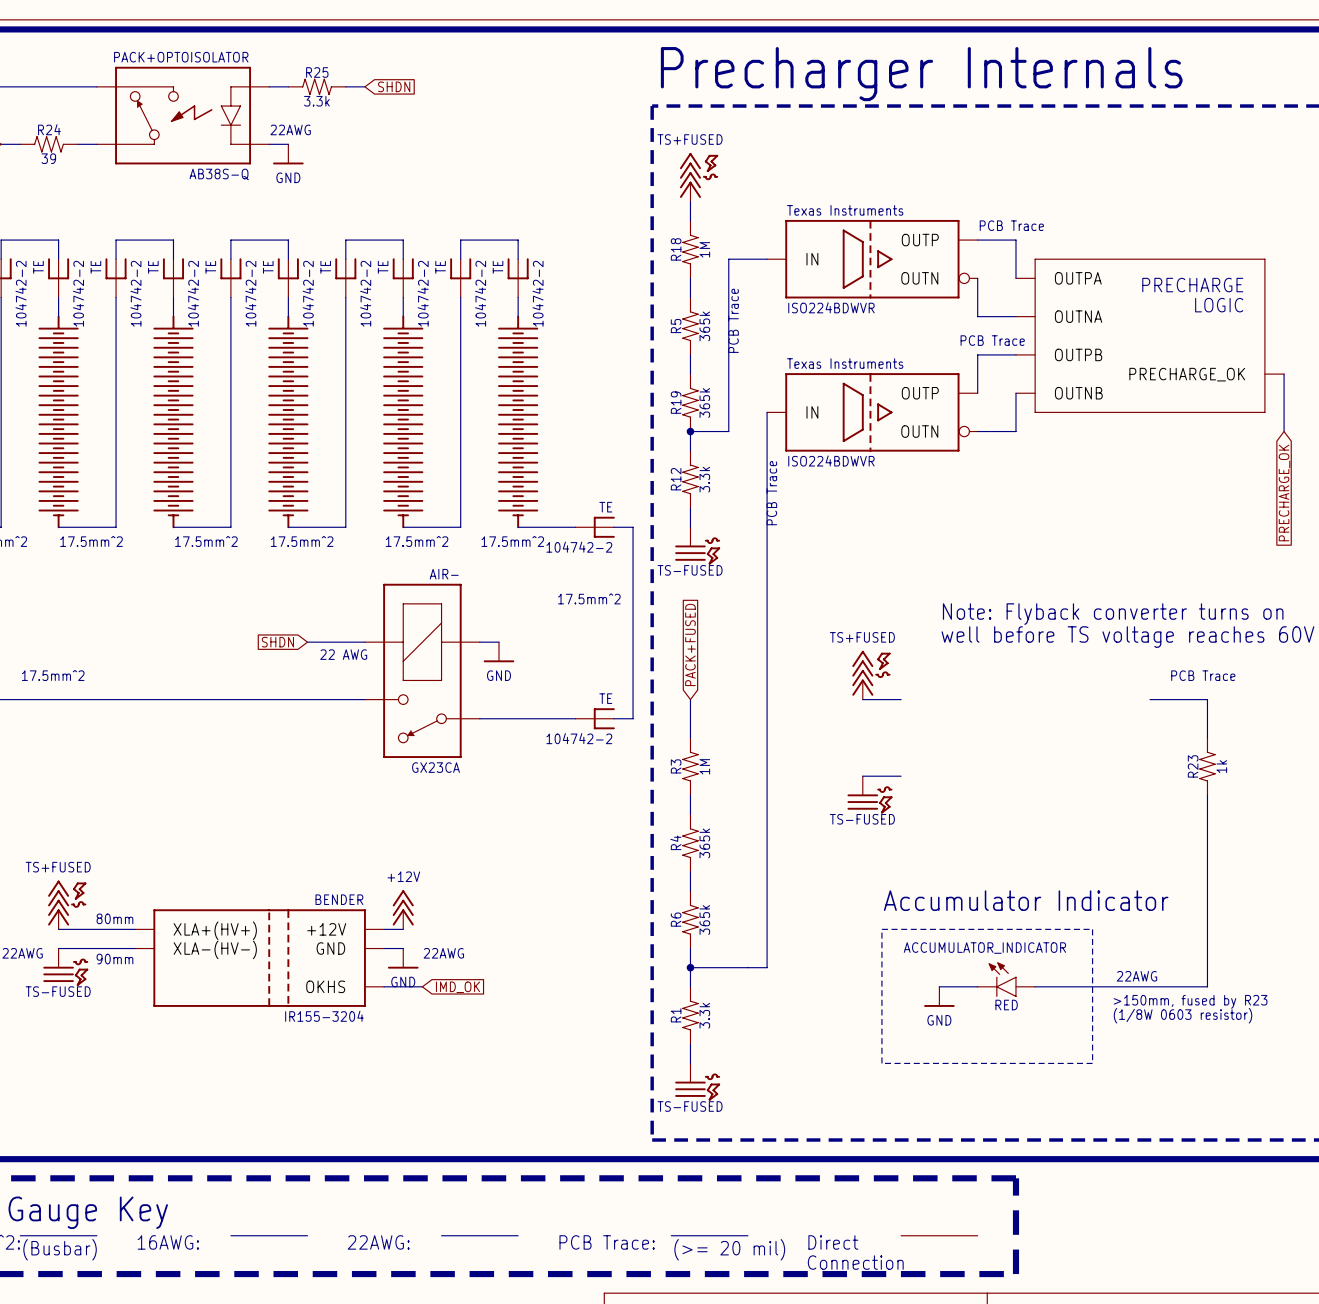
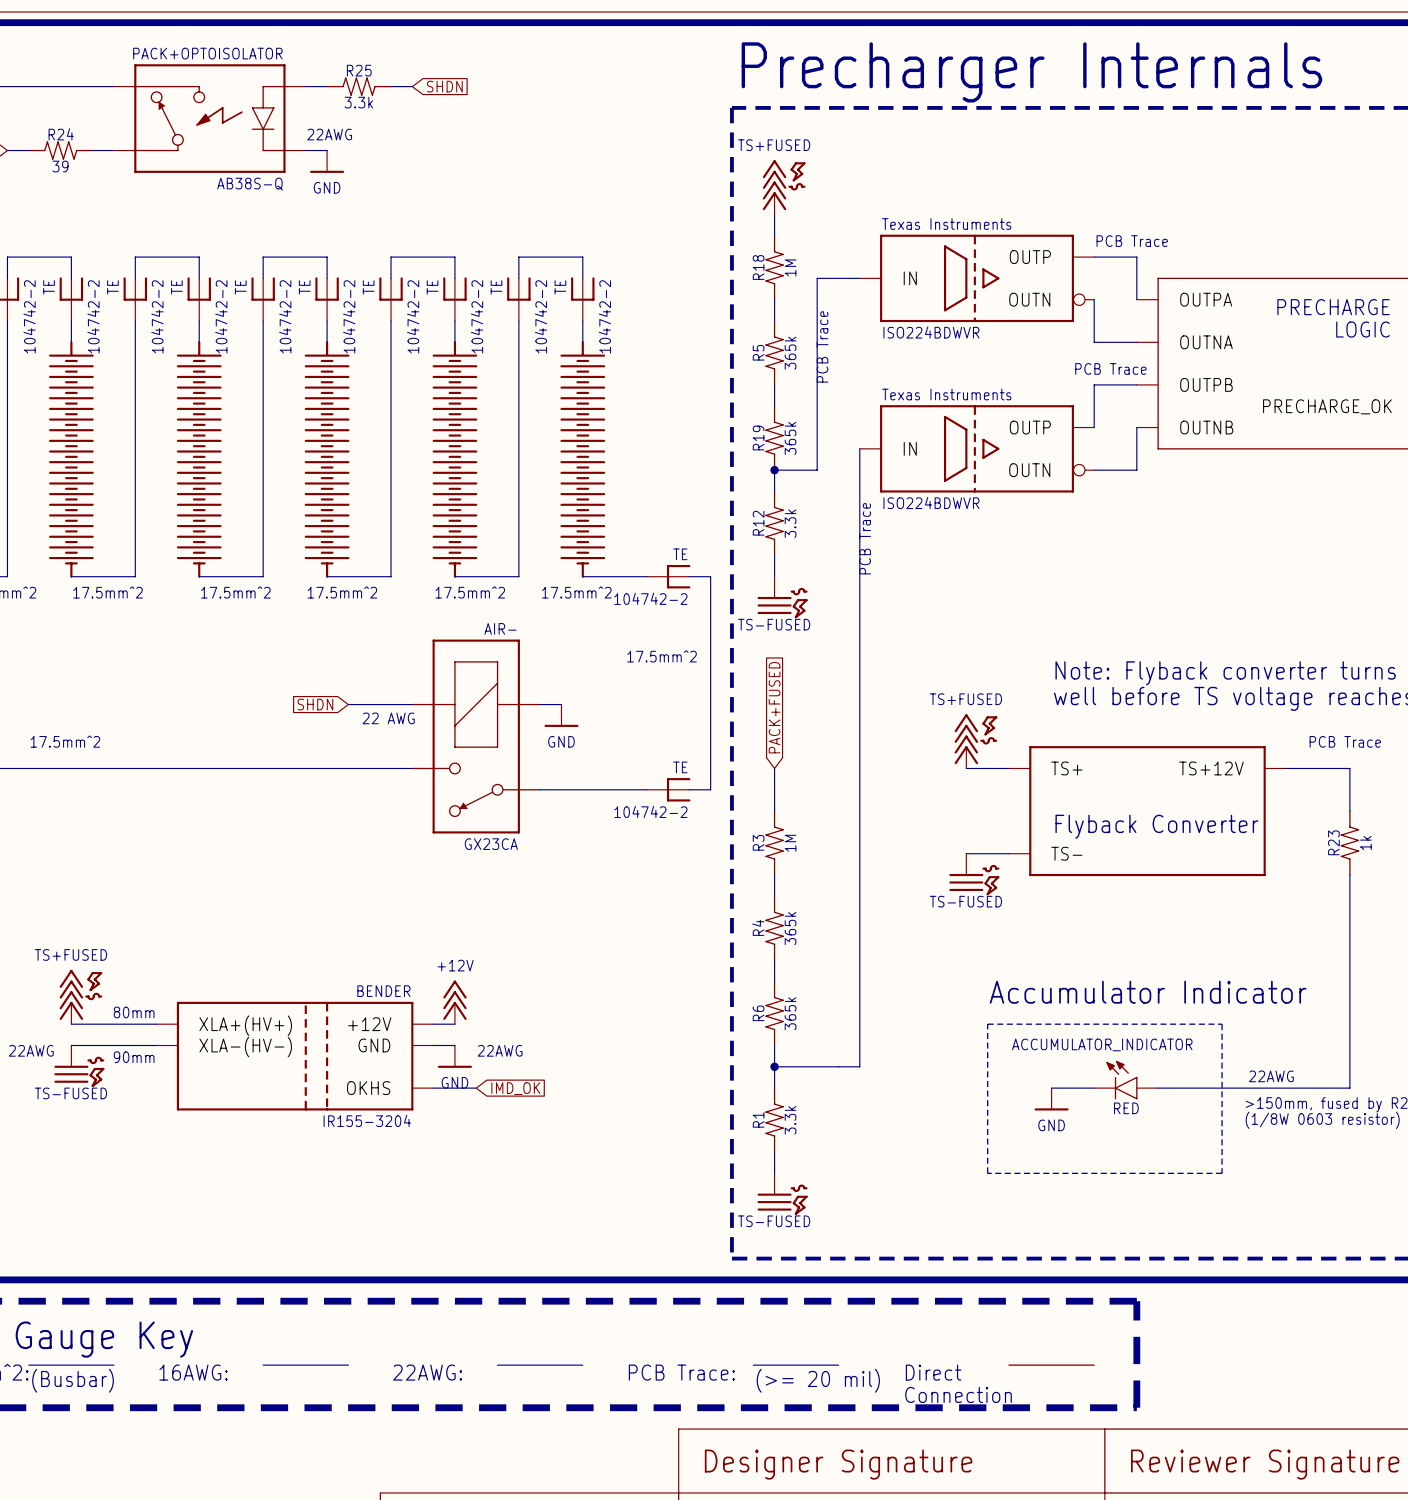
part: none -> (1147, 811)

